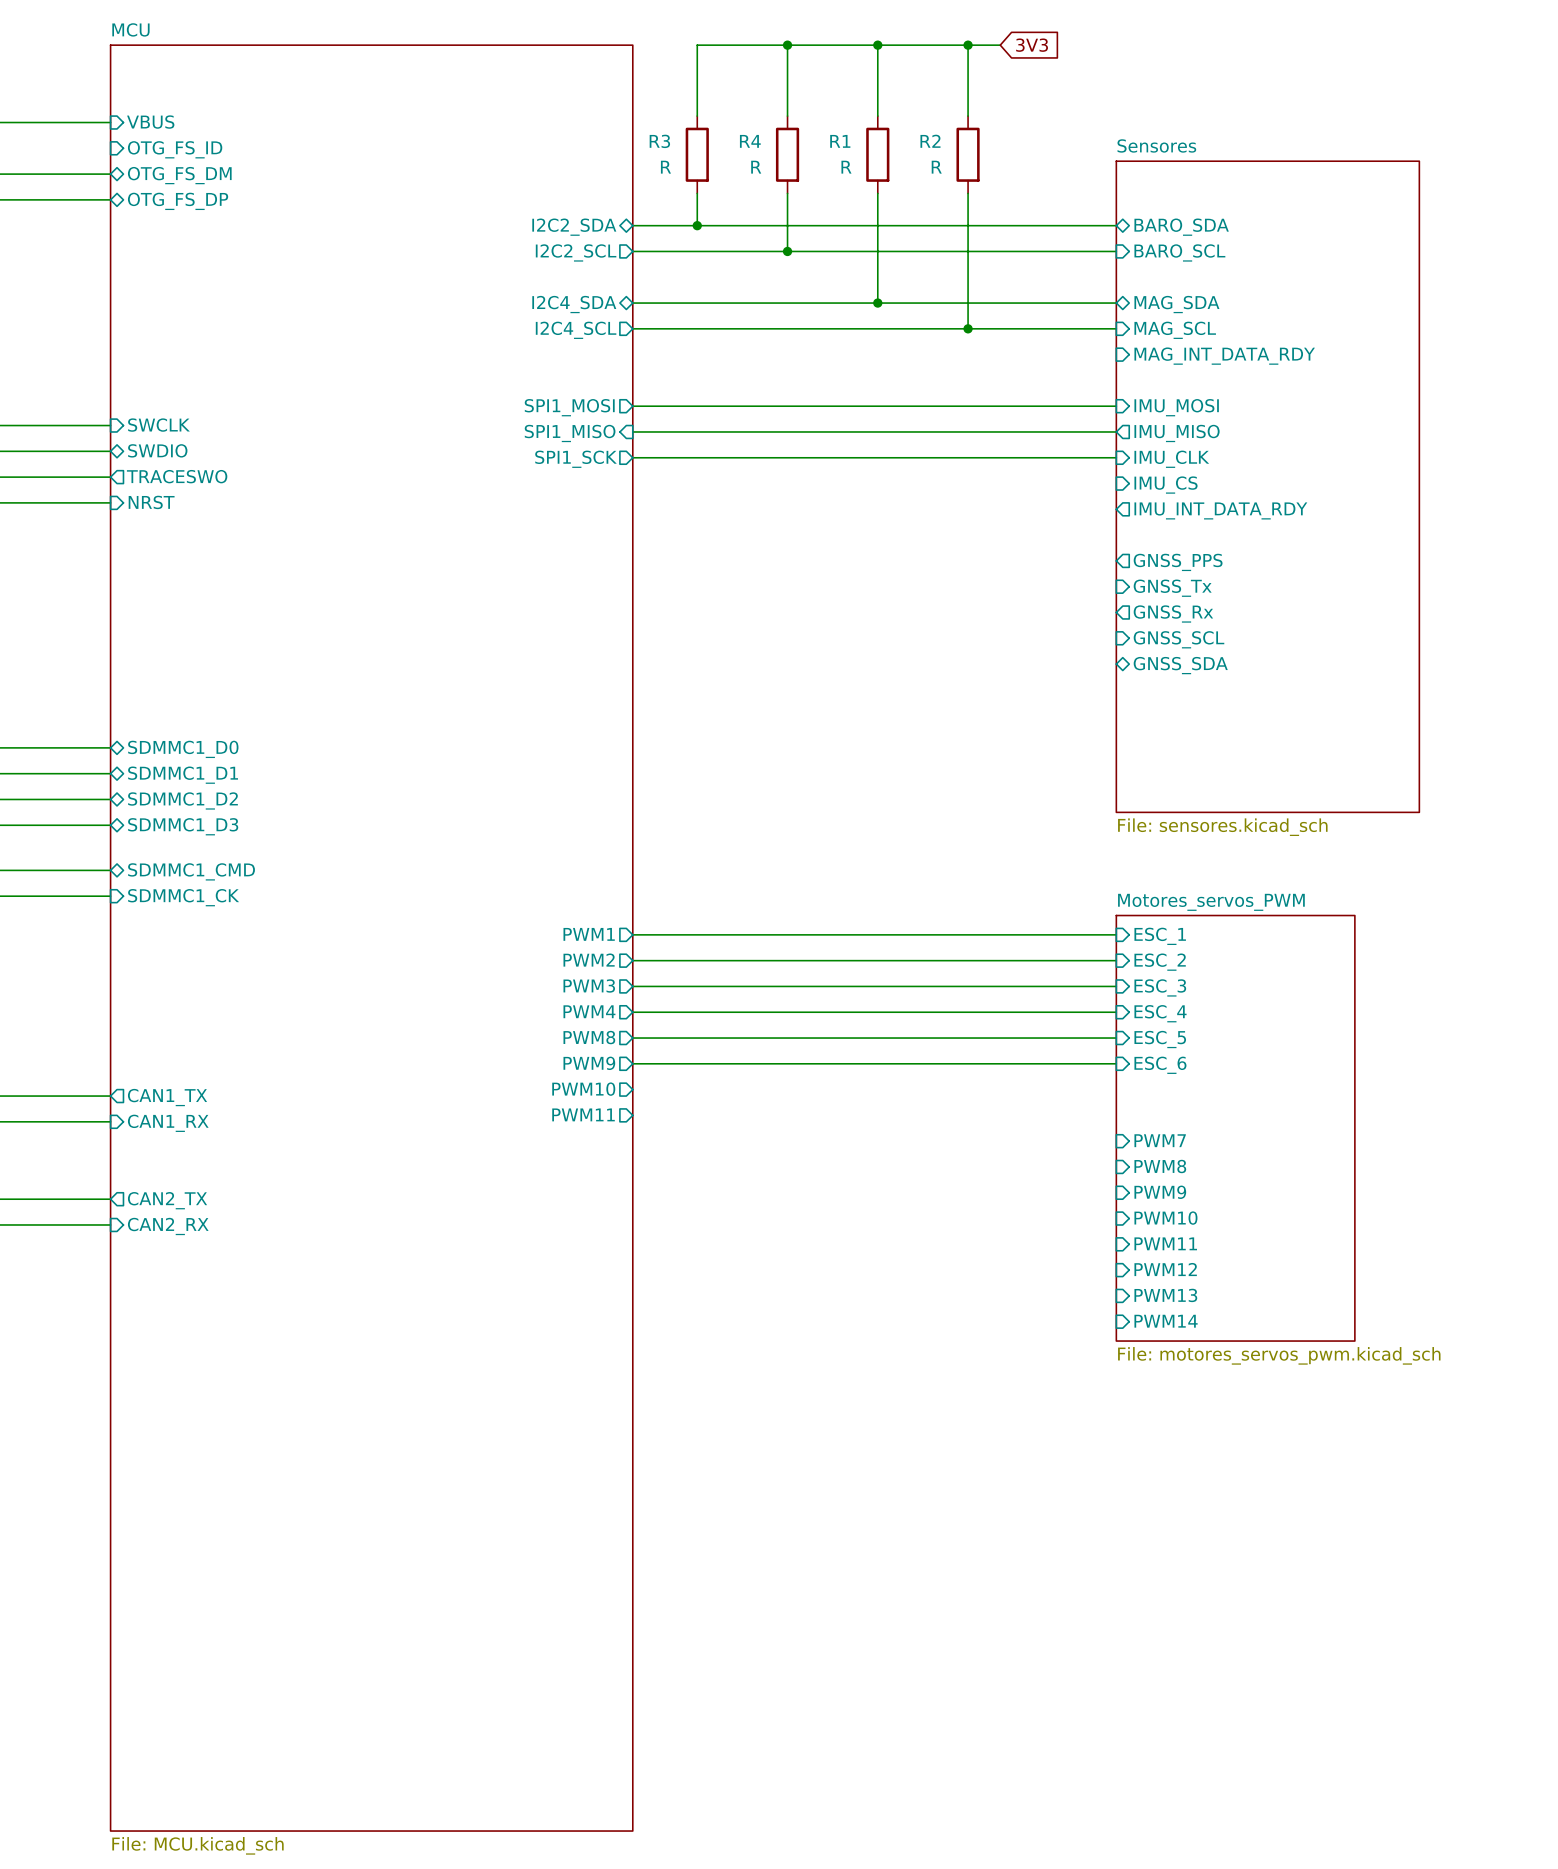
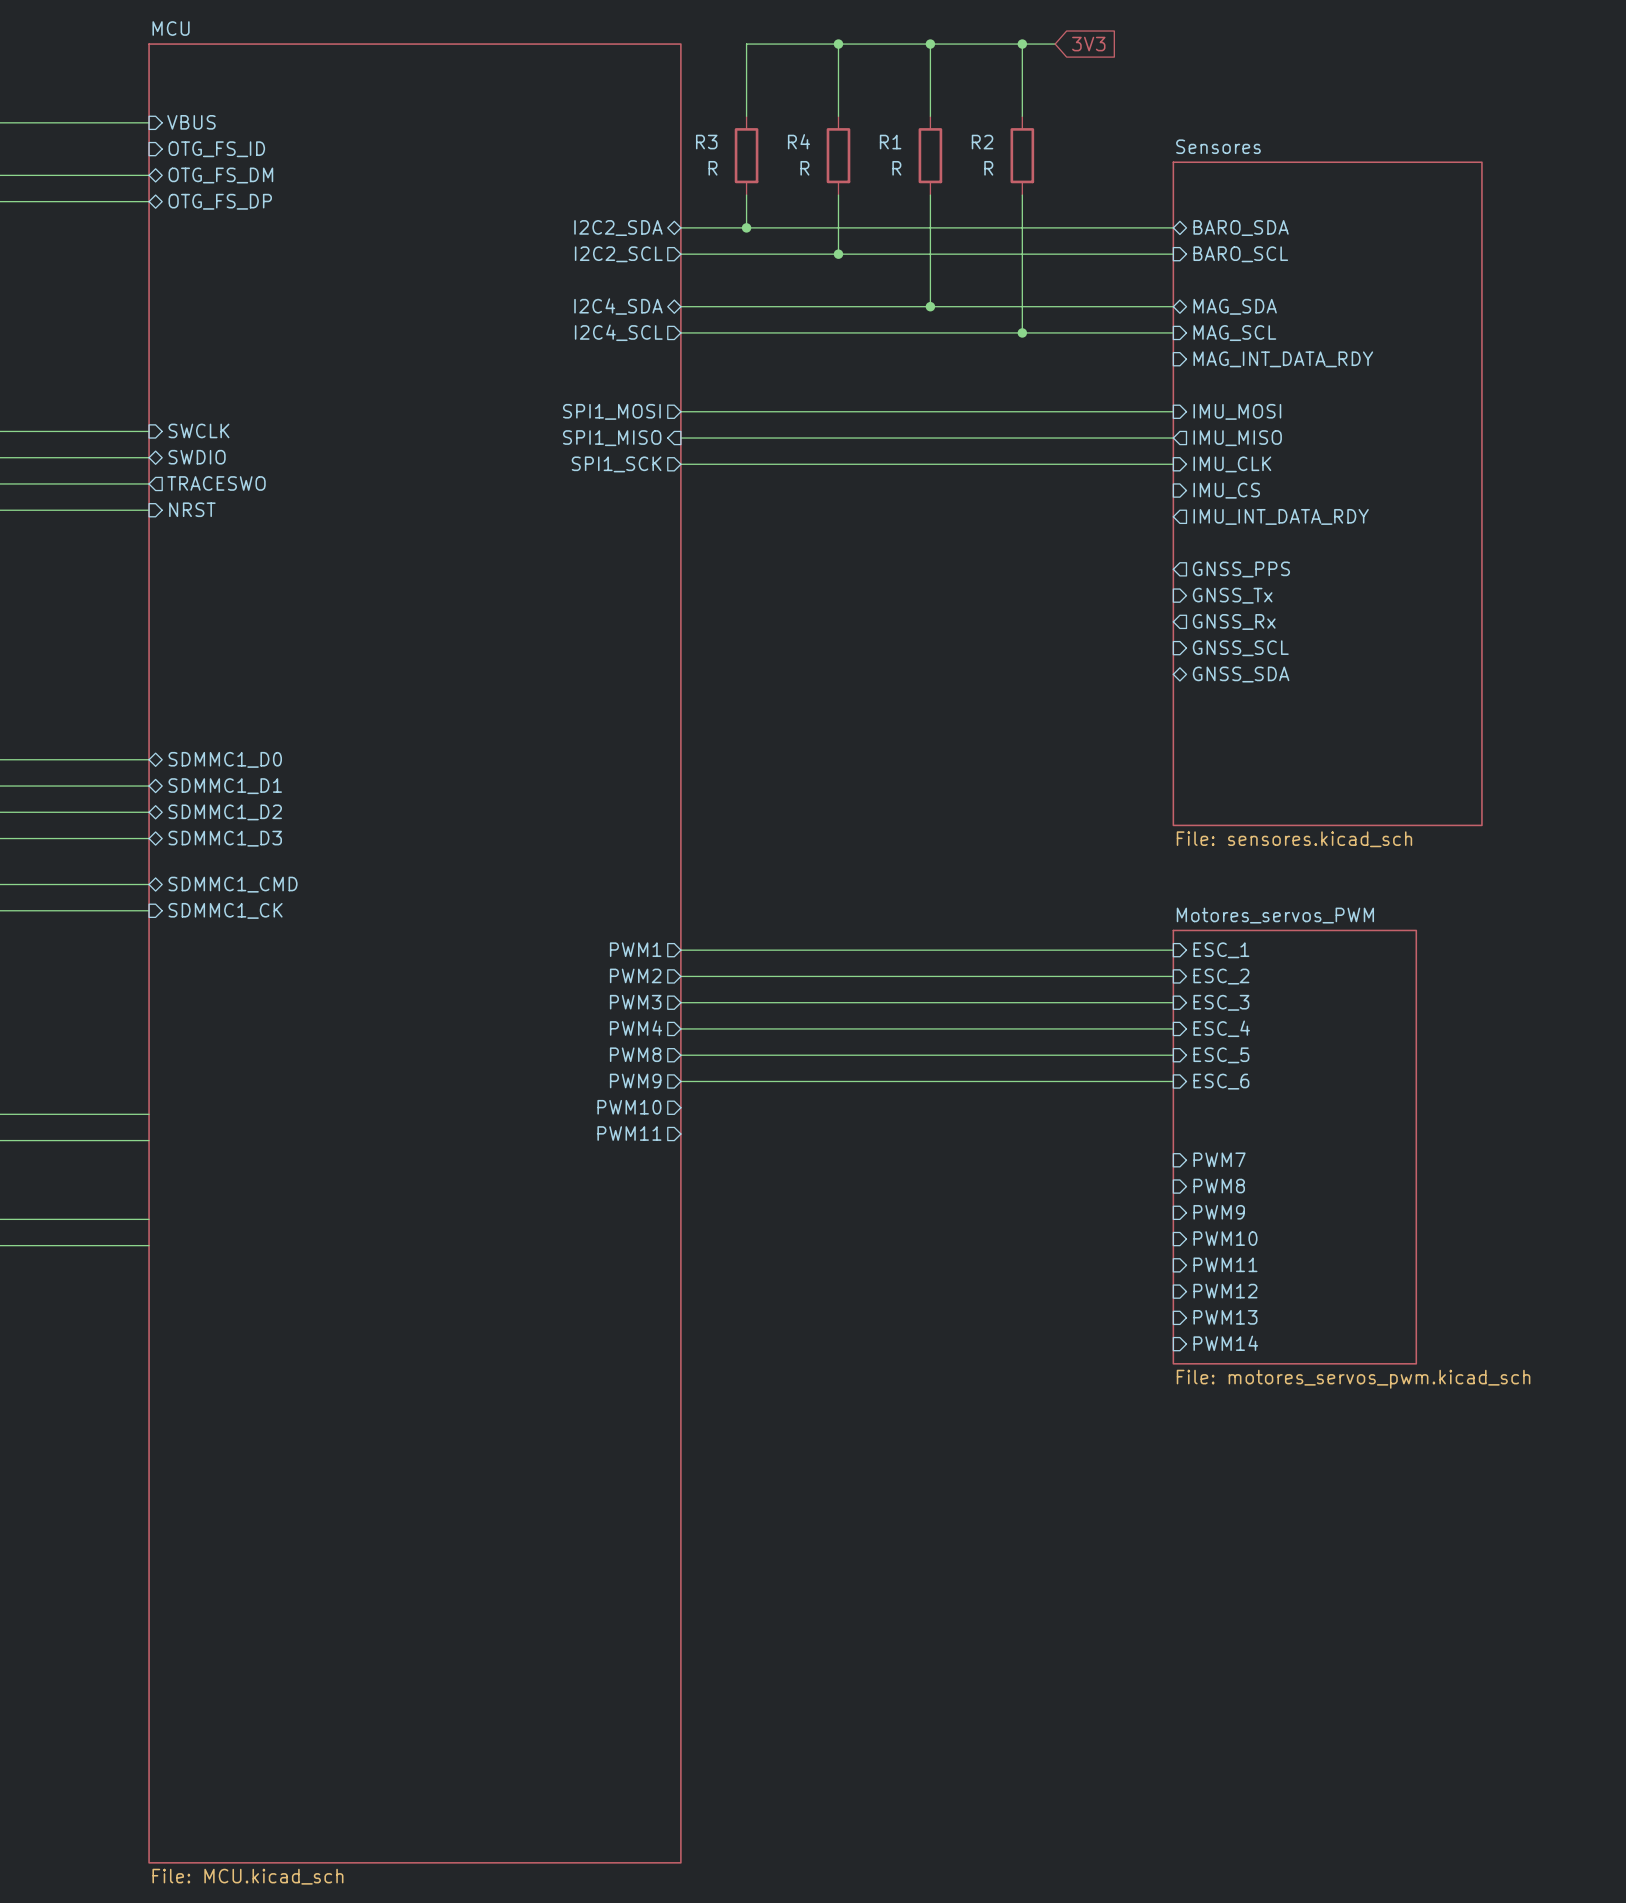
sheet pin: CAN1_TX (167, 1097) -> none
sheet pin: CAN1_RX (168, 1123) -> none
sheet pin: CAN2_TX (167, 1200) -> none
sheet pin: CAN2_RX (168, 1226) -> none

